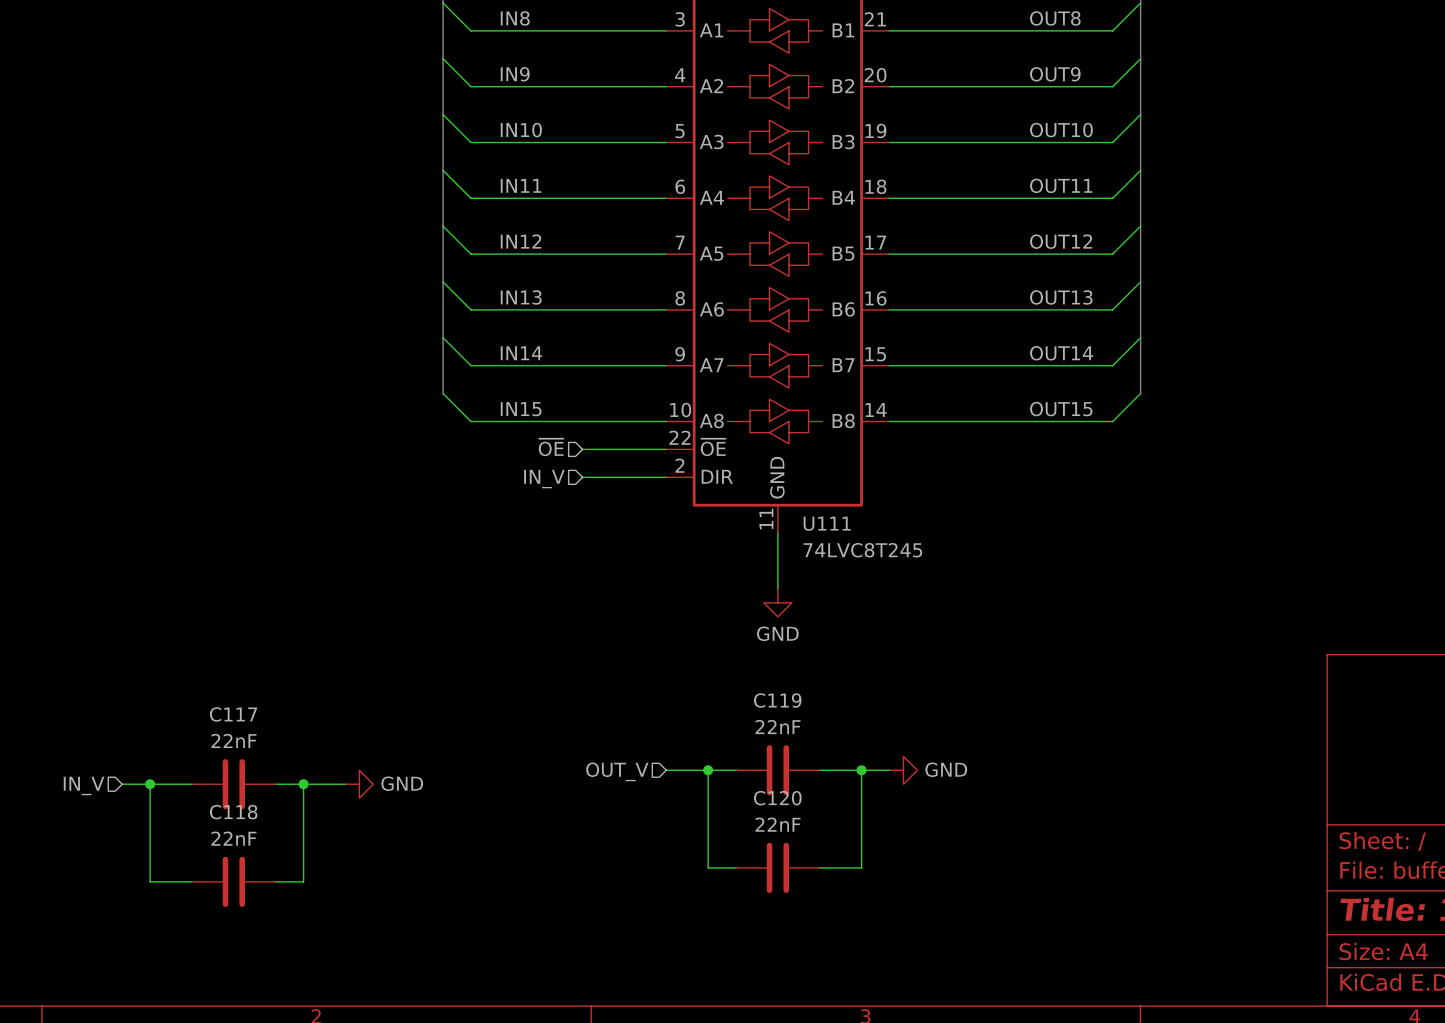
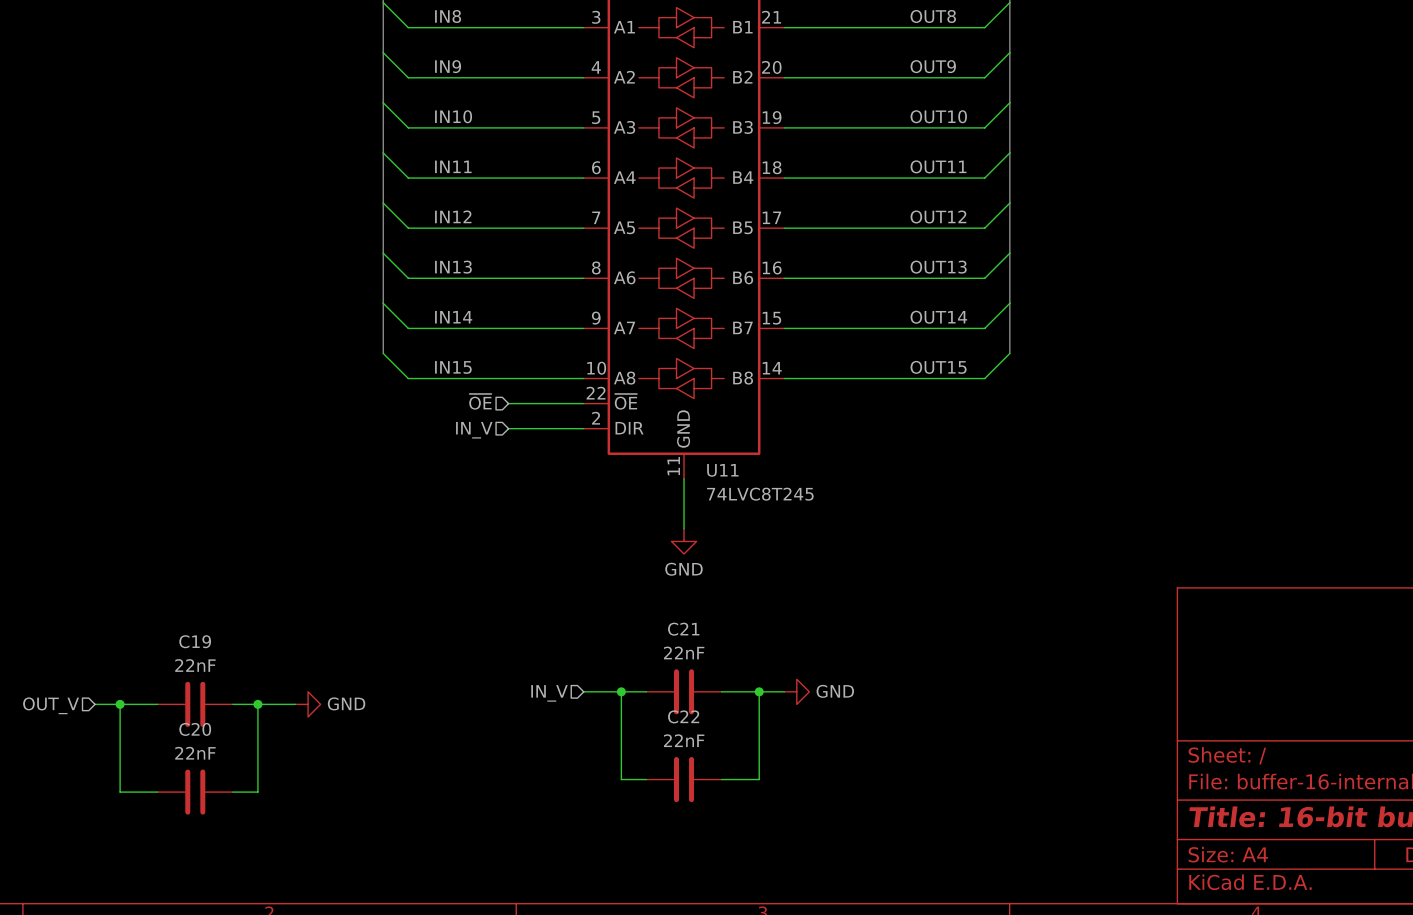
U111 name: U111 (827, 523) -> U11 (722, 470)
C119 name: C119 (777, 700) -> C21 (683, 629)
C117 name: C117 (233, 714) -> C19 (195, 641)
hierarchical label: OUT_V (617, 771) -> IN_V (549, 693)
hierarchical label: IN_V (84, 785) -> OUT_V (51, 705)
C120 name: C120 (777, 798) -> C22 (683, 716)
C118 name: C118 (233, 812) -> C20 (195, 729)

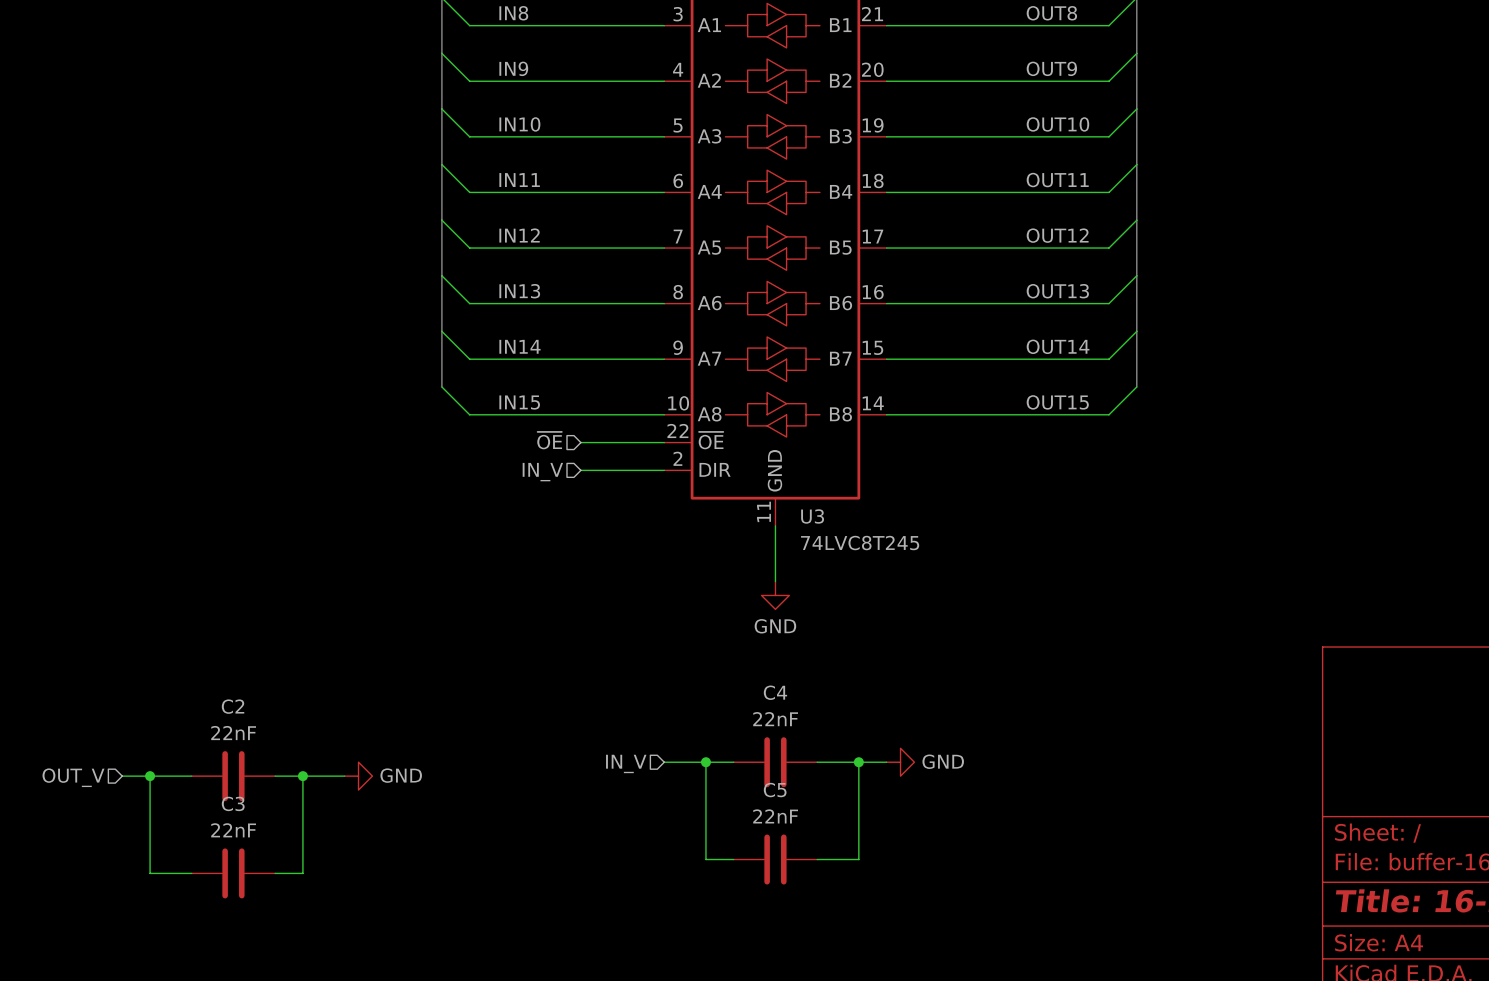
U11 name: U11 (722, 470) -> U3 (812, 516)
C21 name: C21 (683, 629) -> C4 (775, 692)
C19 name: C19 (195, 641) -> C2 (233, 706)
C22 name: C22 (683, 716) -> C5 (775, 790)
C20 name: C20 (195, 729) -> C3 (233, 803)

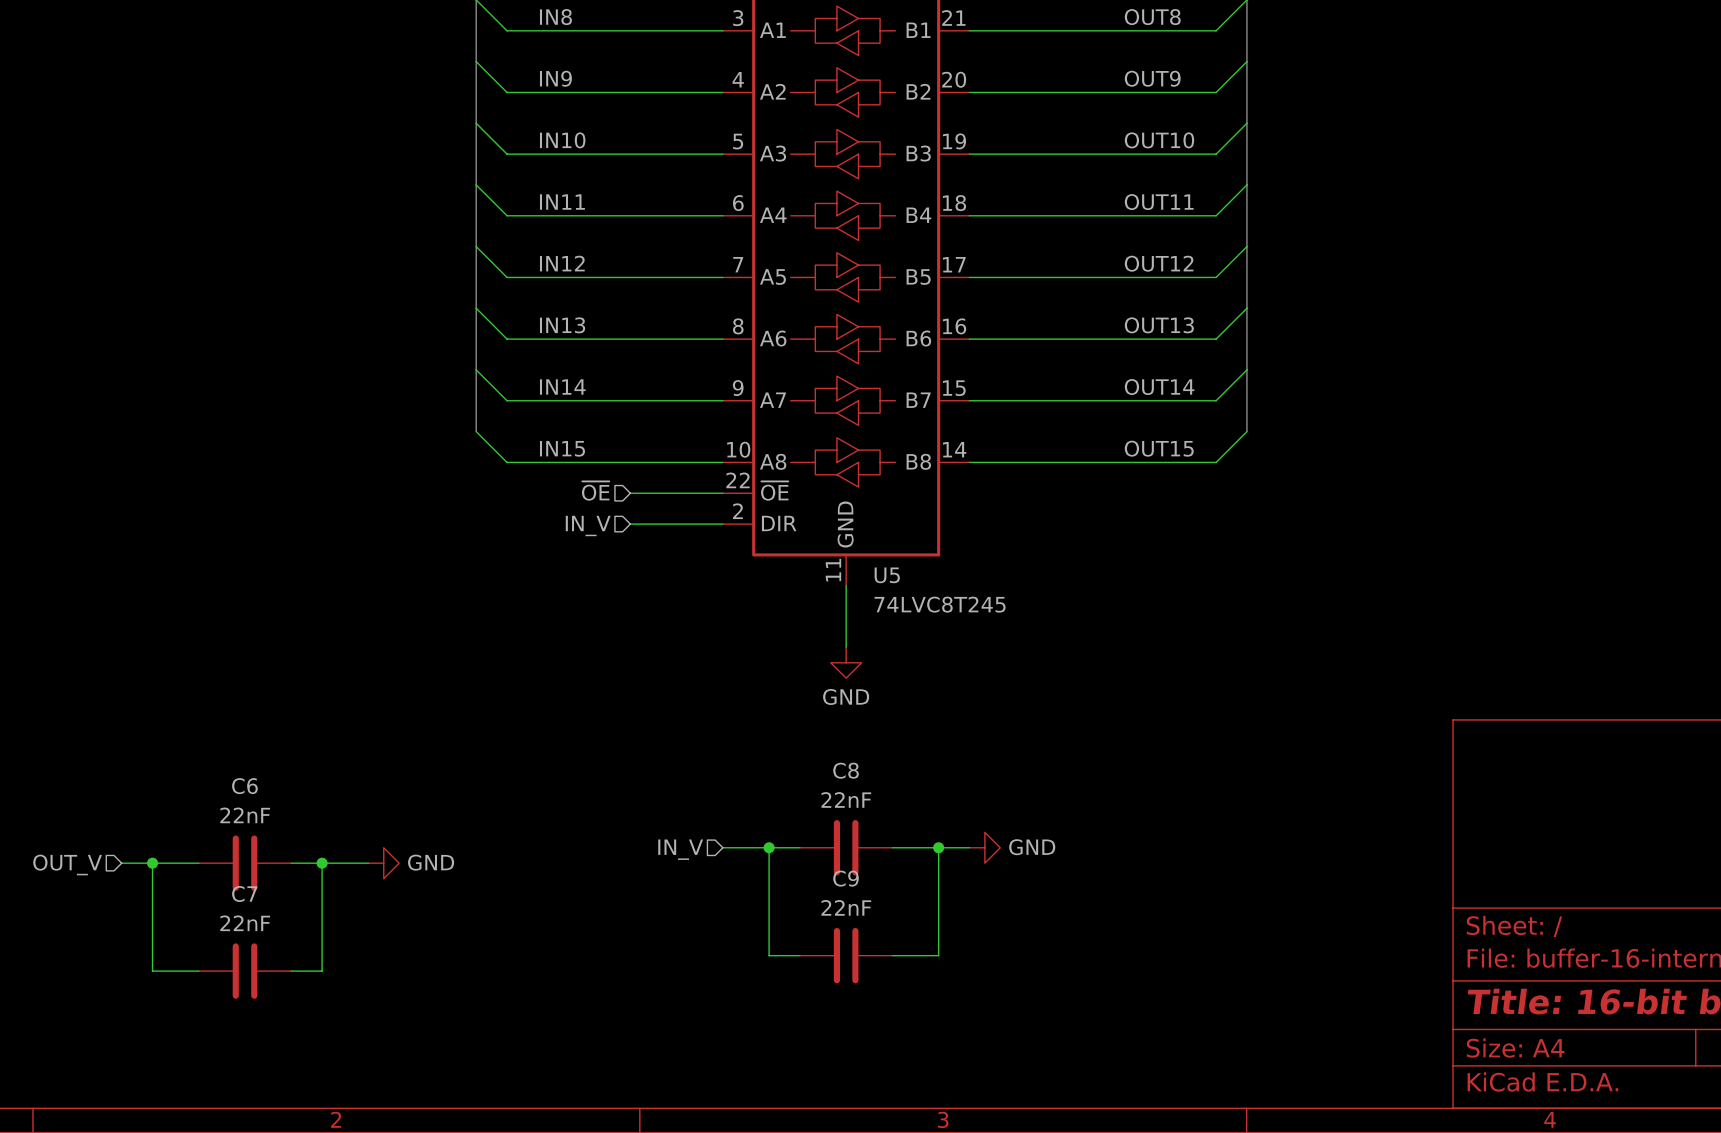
U3 name: U3 (812, 516) -> U5 (887, 575)
C4 name: C4 (775, 692) -> C8 (846, 770)
C2 name: C2 (233, 706) -> C6 (244, 786)
C5 name: C5 (775, 790) -> C9 (846, 878)
C3 name: C3 (233, 803) -> C7 (244, 894)

